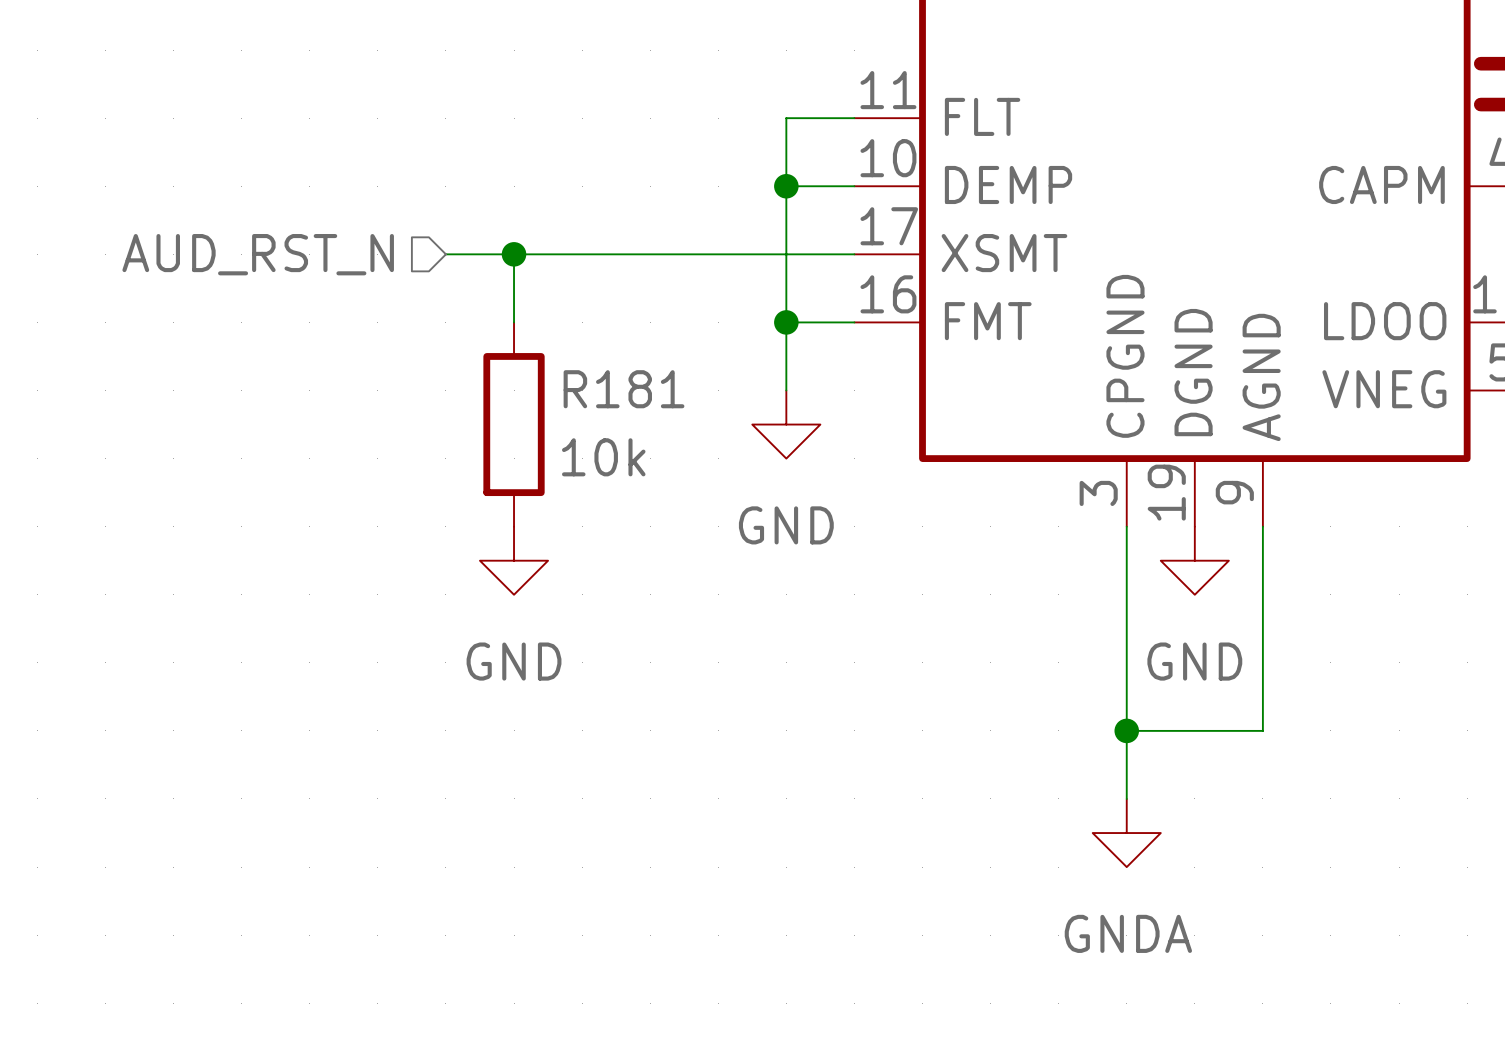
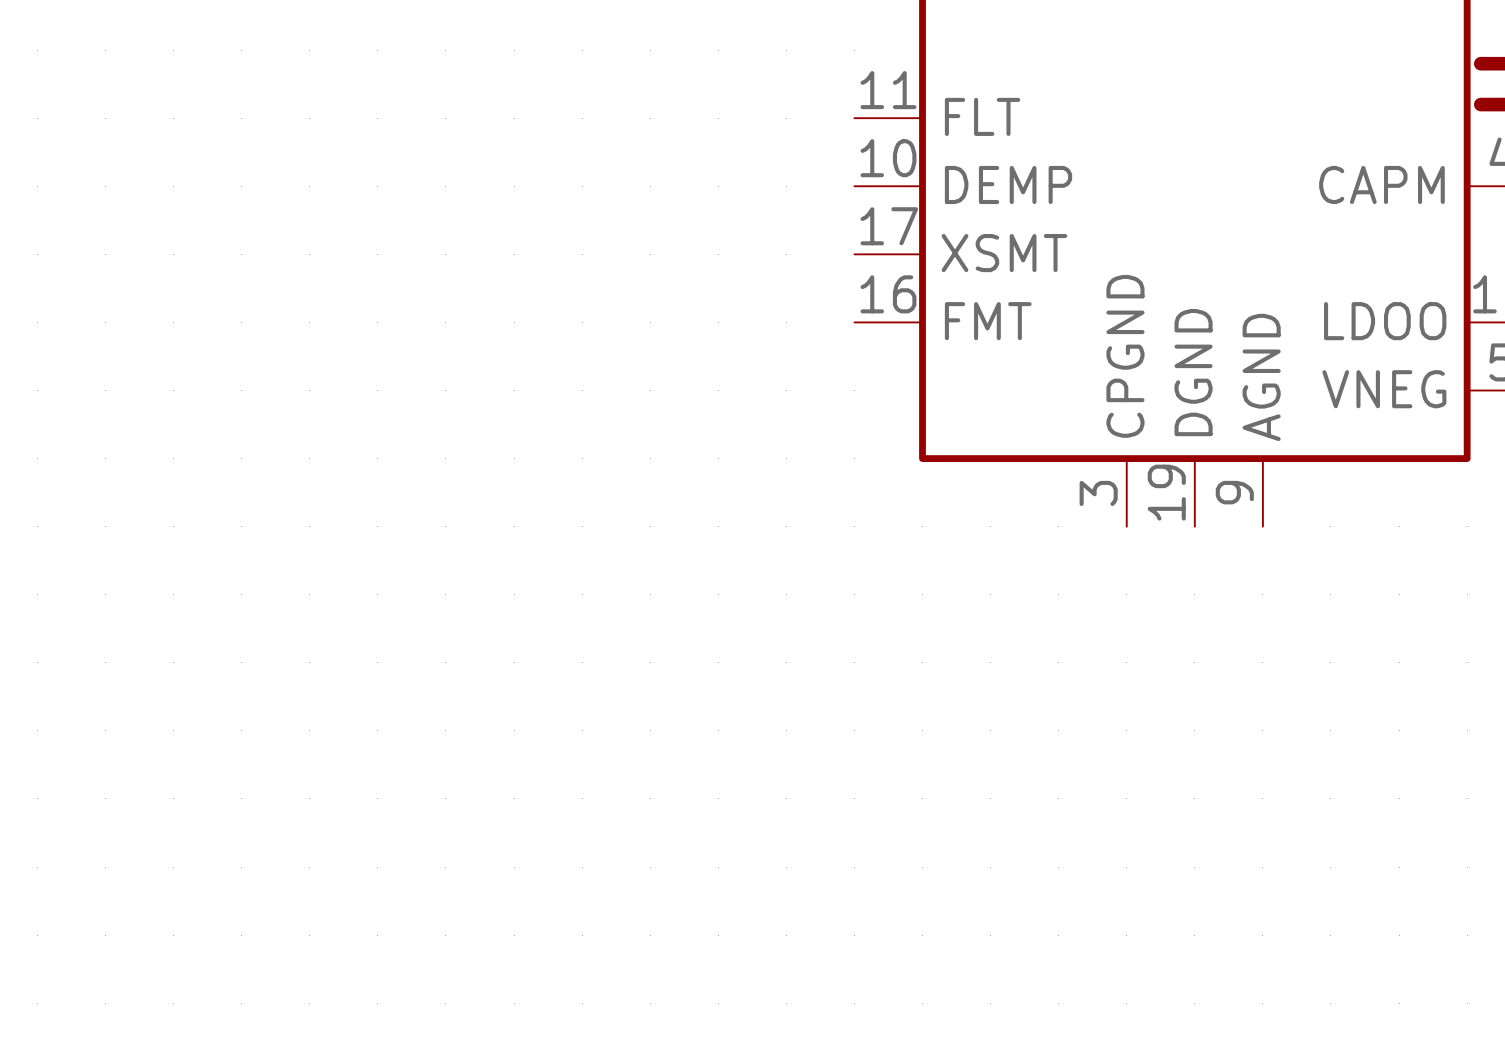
wire: (854, 118) (786, 118) (786, 390) -> none
wire: (786, 186) (854, 186) -> none
junction: (786, 186) -> none
hierarchical label: AUD_RST_N (258, 254) -> none
wire: (445, 254) (854, 254) -> none
wire: (514, 254) (514, 322) -> none
junction: (514, 254) -> none
wire: (786, 322) (854, 322) -> none
junction: (786, 322) -> none
R181: 10k (514, 424) -> none
power symbol: GND (786, 424) -> none
wire: (1126, 526) (1126, 798) -> none
wire: (1262, 526) (1262, 730) (1126, 730) -> none
power symbol: GND (514, 560) -> none
power symbol: GND (1194, 560) -> none
junction: (1126, 730) -> none
power symbol: GNDA (1126, 833) -> none

